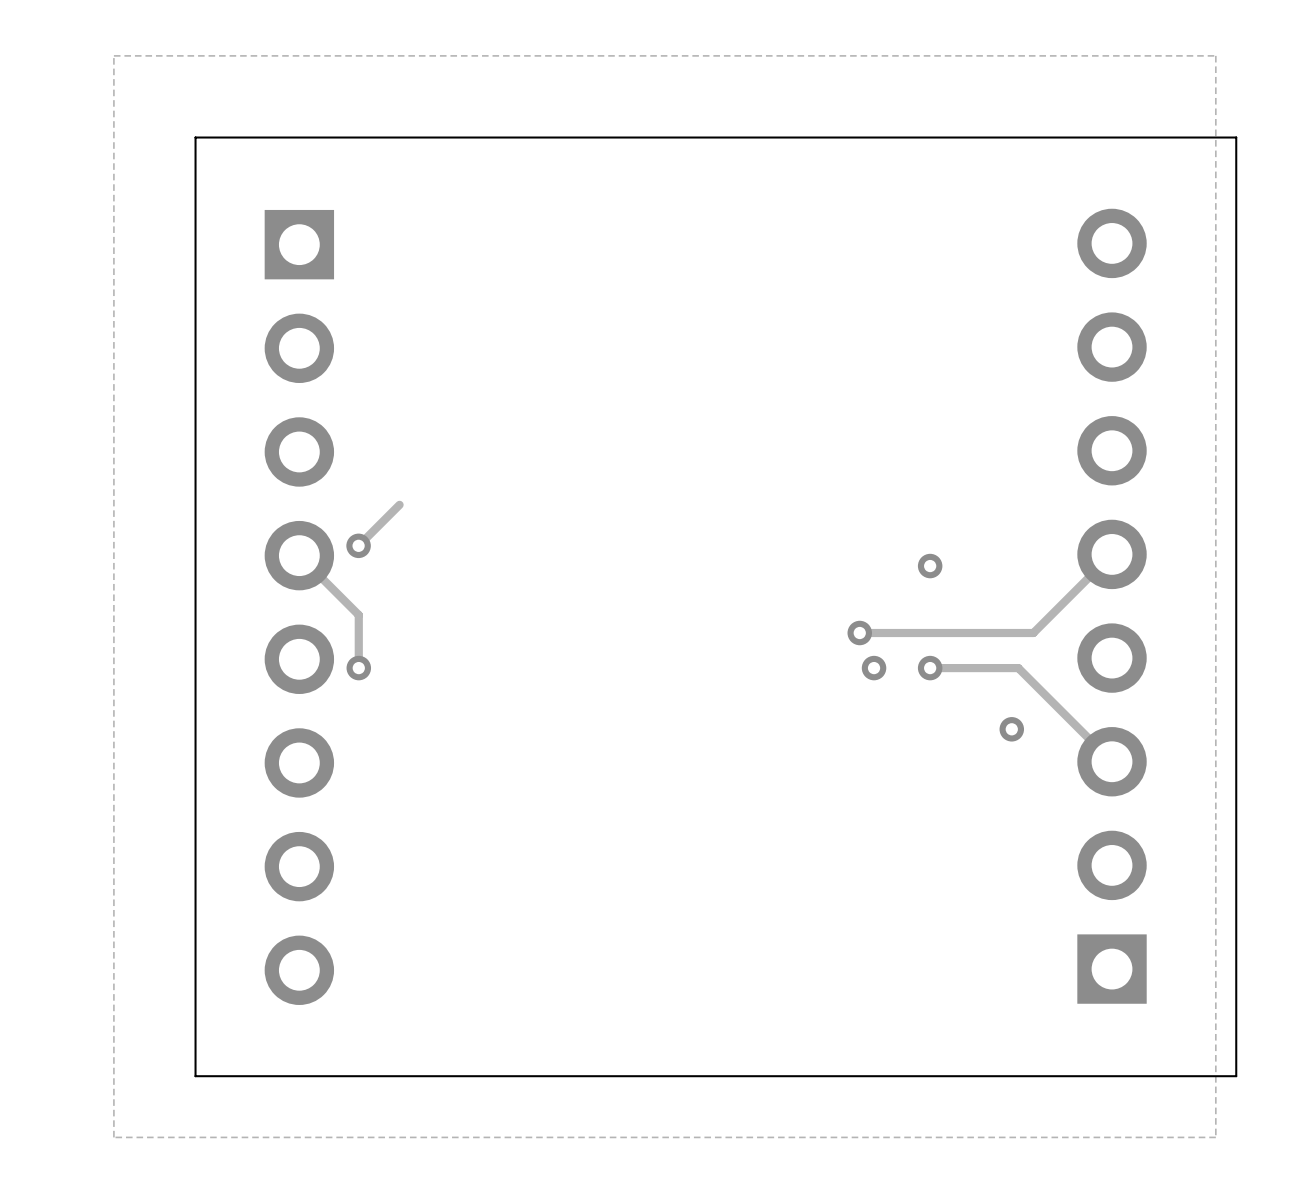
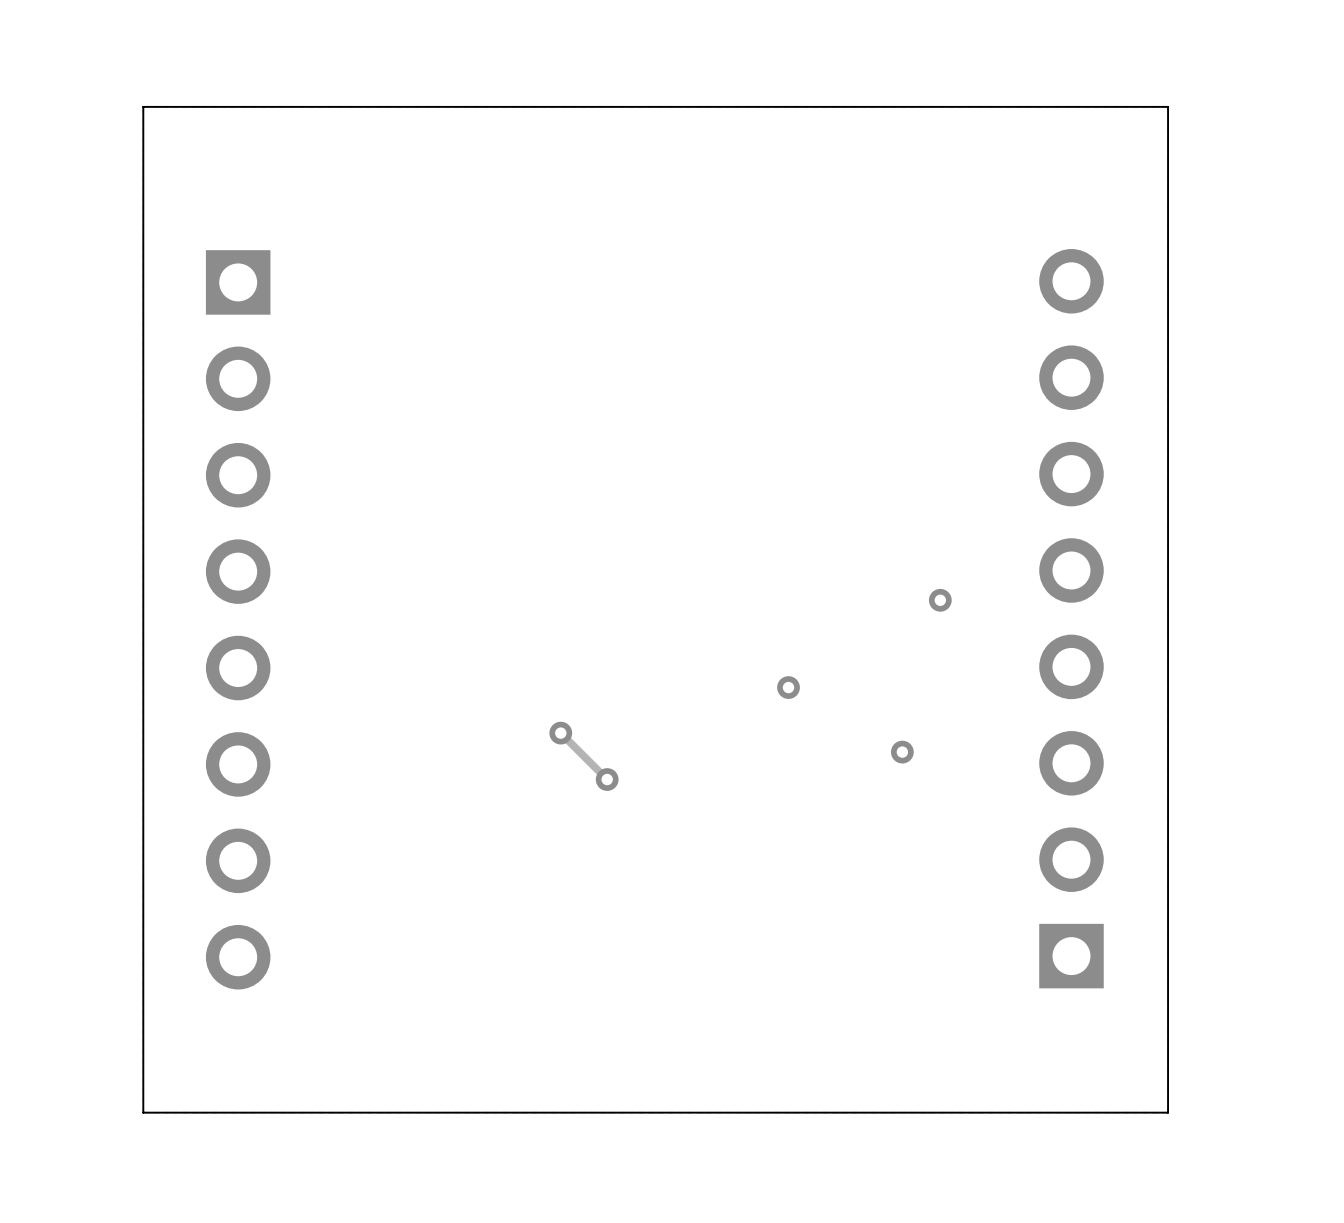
board edge: (1236, 137) (195, 137) (195, 1076) (1236, 1076) (1236, 137) -> (1168, 106) (1168, 1112) (143, 1112) (143, 106) (1168, 106)
track: (399, 504) (358, 545) -> none
via: (358, 545) -> none
track: (1112, 554) (1033, 633) (859, 633) -> none
track: (299, 555) (358, 615) (358, 668) -> none
via: (930, 566) -> none
via: none -> (940, 600)
part position: (299, 607) -> (238, 619)
via: (859, 633) -> none
via: (358, 668) -> none
via: (874, 668) -> none
track: (930, 668) (1018, 668) (1112, 761) -> none
via: (930, 668) -> none
via: none -> (788, 687)
track: none -> (560, 733) (607, 779)
via: none -> (560, 733)
via: (1011, 729) -> none
via: none -> (902, 752)
via: none -> (607, 779)

